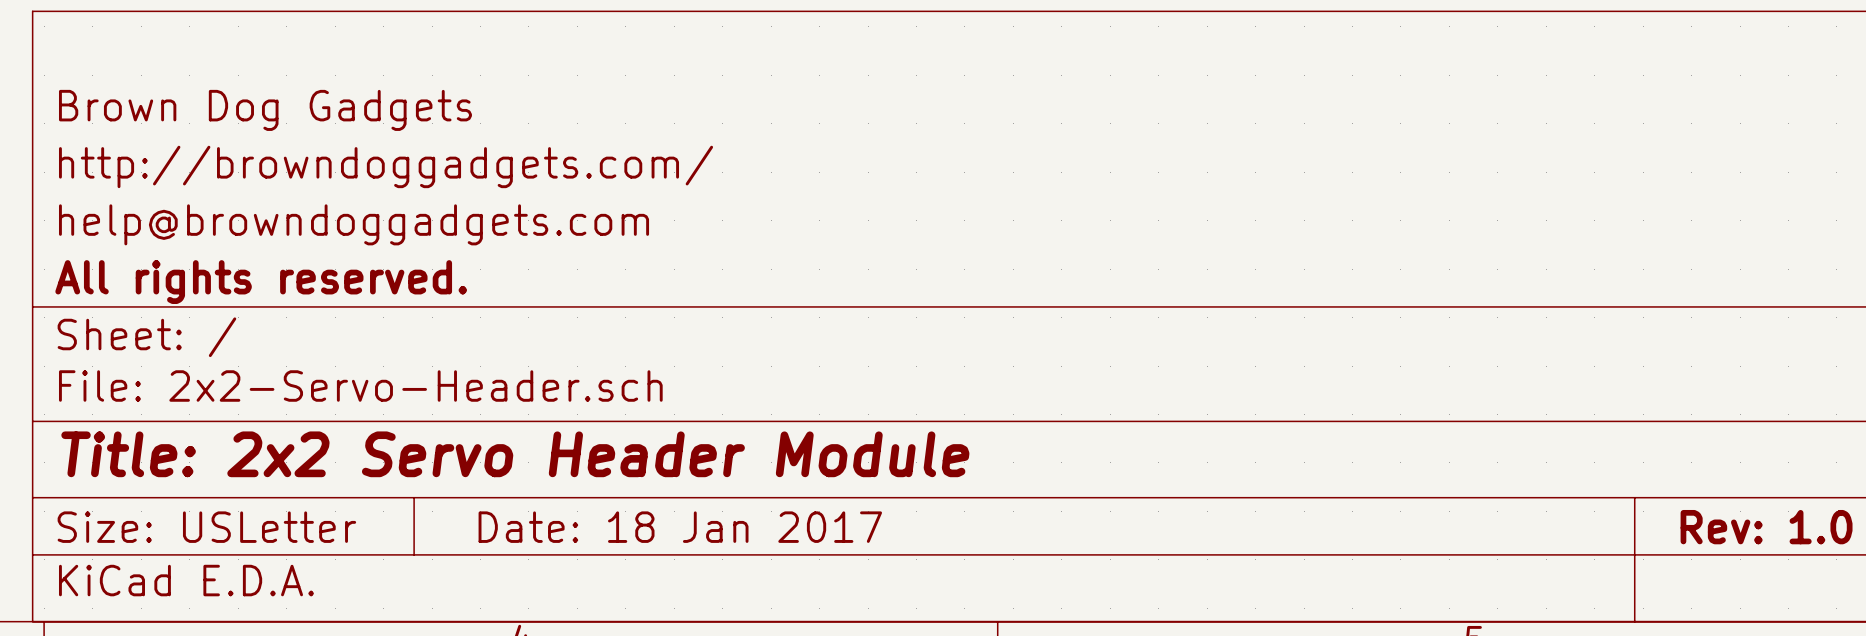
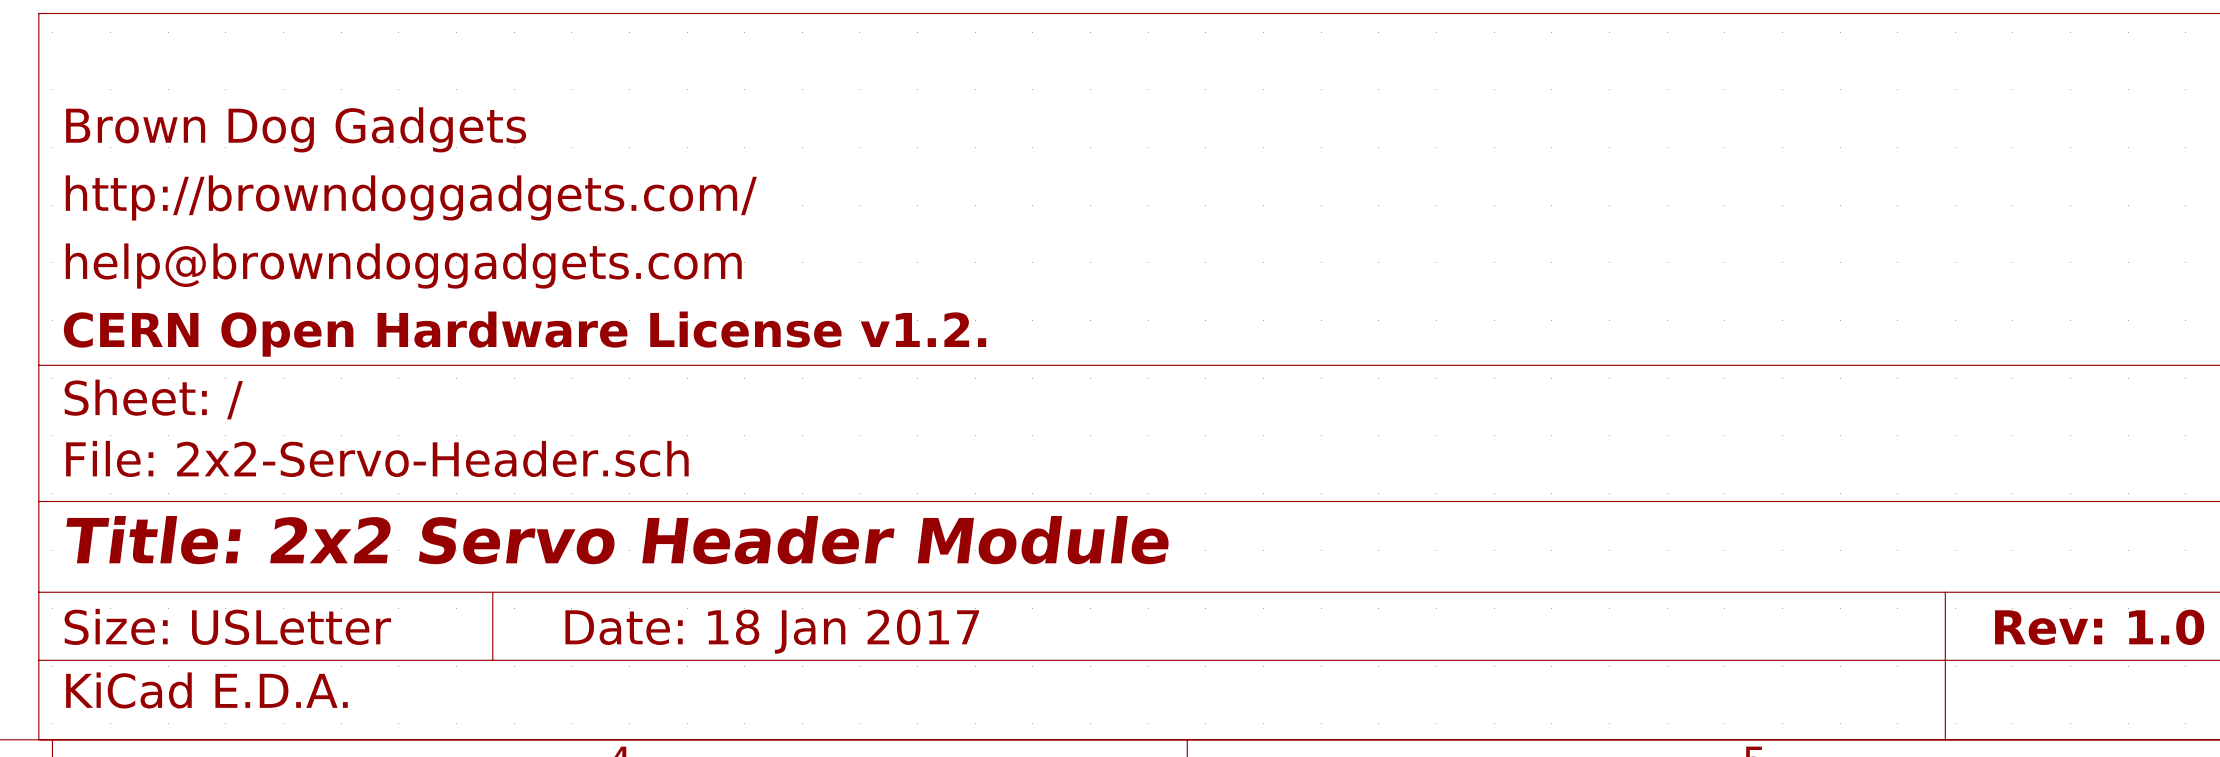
title block: All rights reserved. (261, 282) -> CERN Open Hardware License v1.2. (525, 334)

